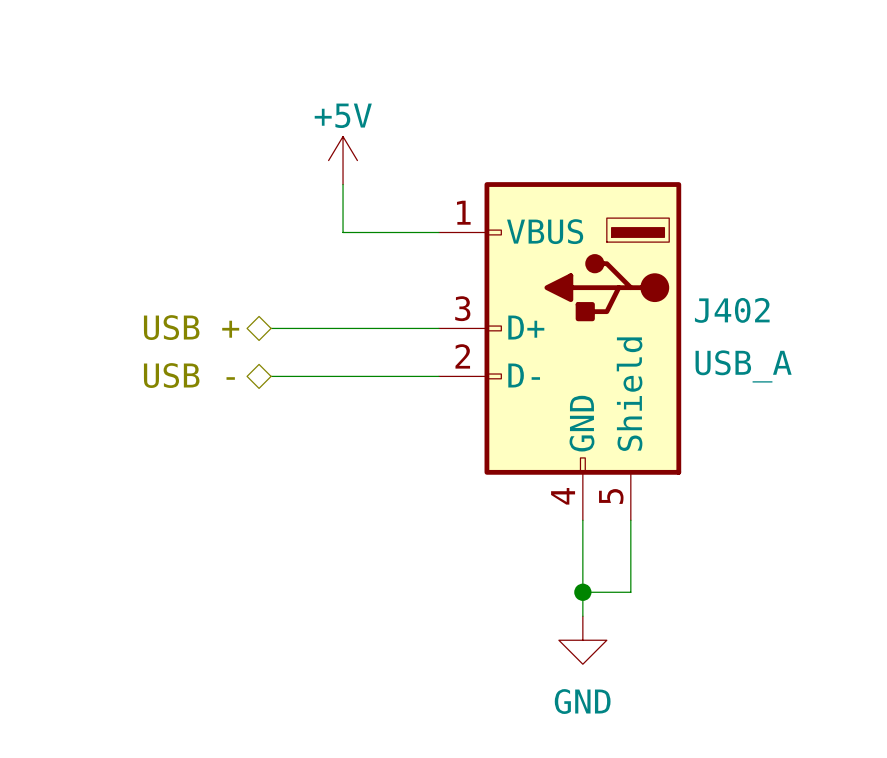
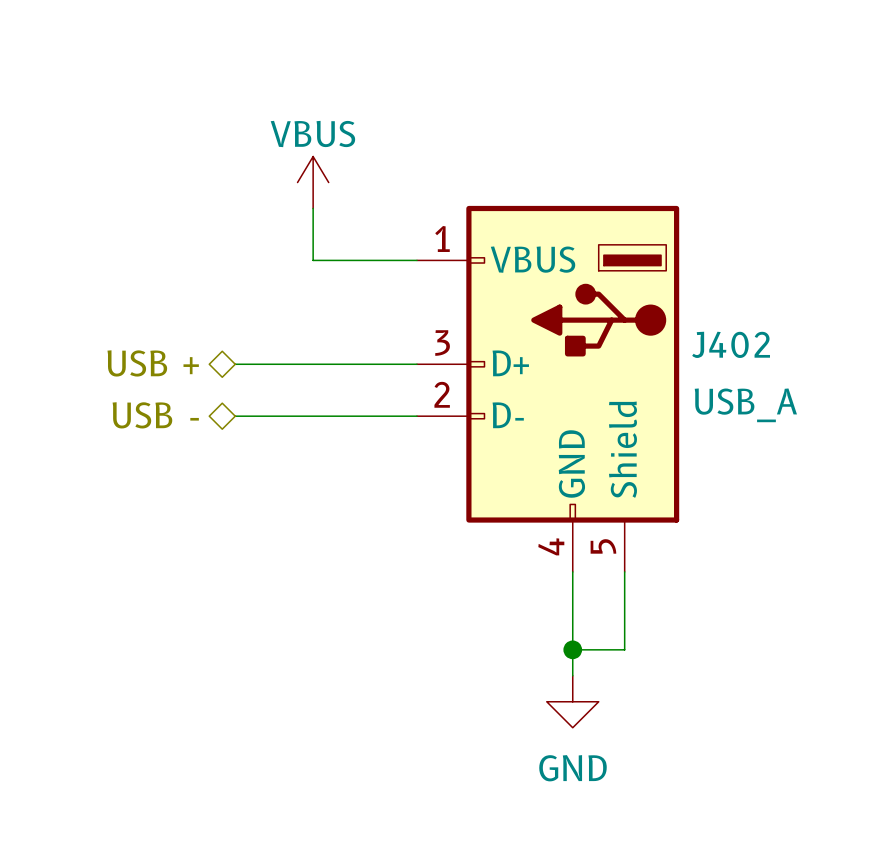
power symbol: +5V (343, 160) -> VBUS (313, 182)

